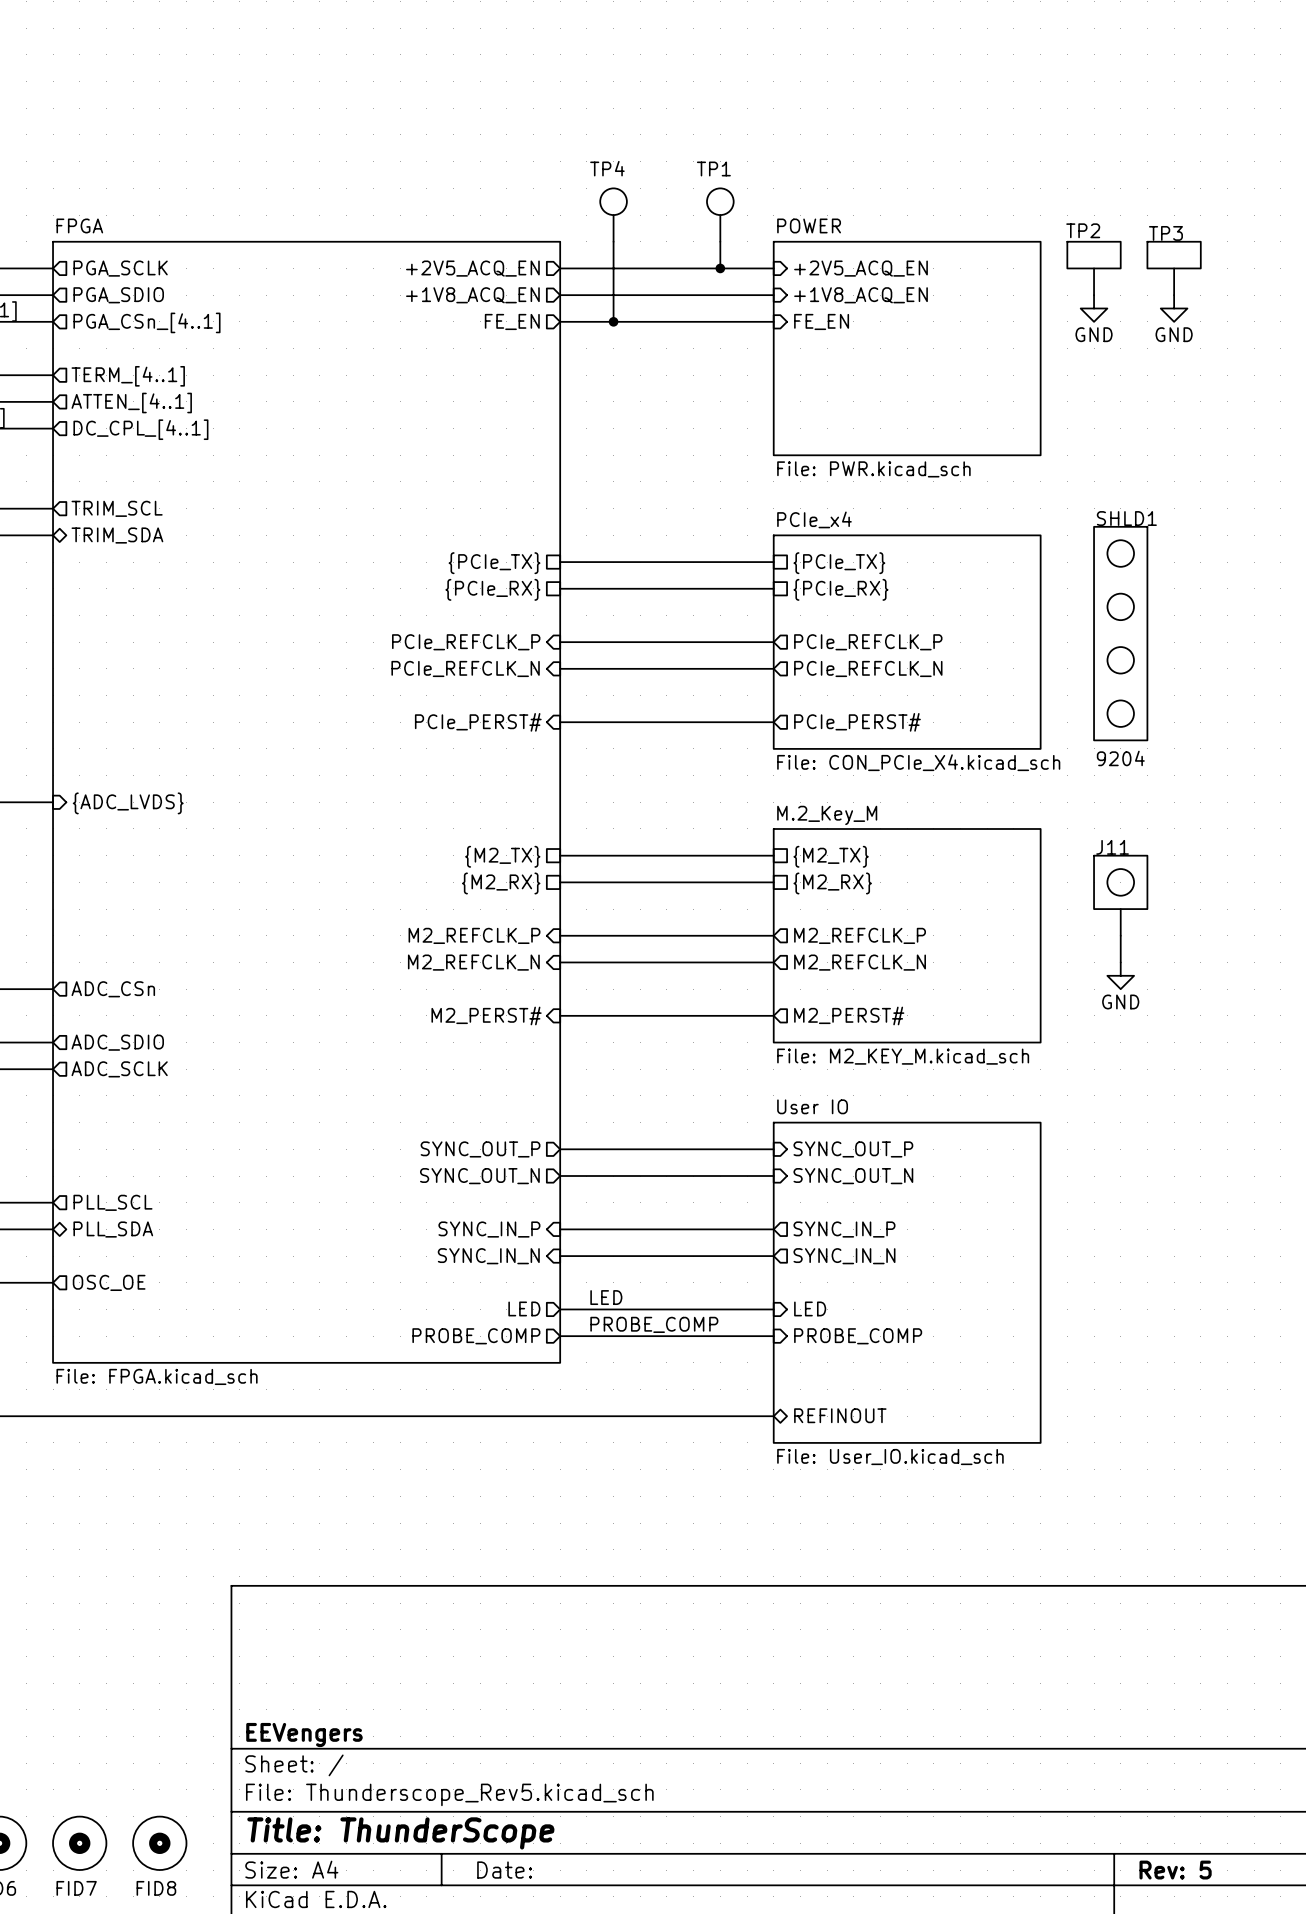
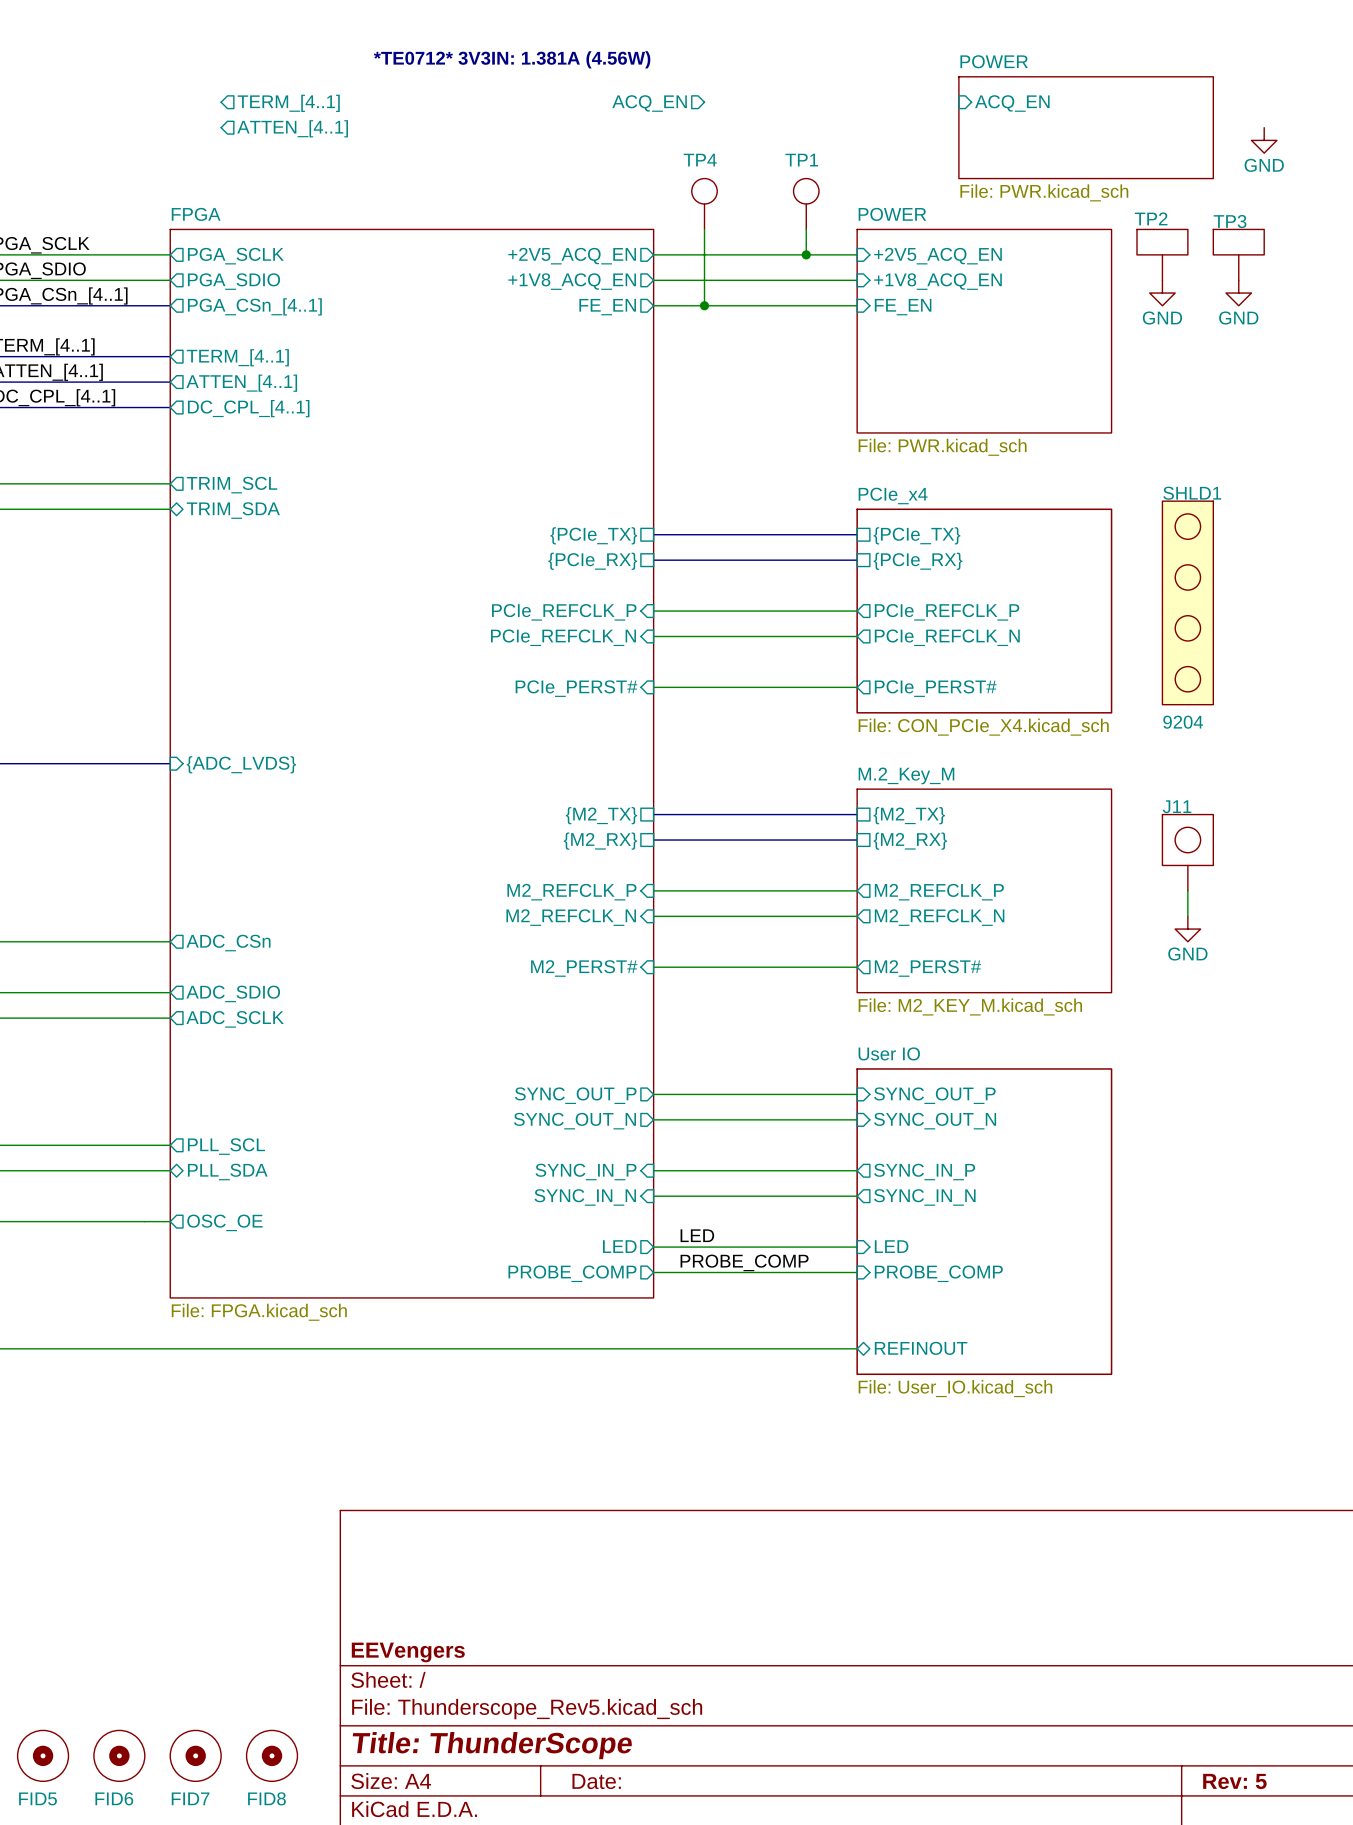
text: none -> *TE0712* 3V3IN: 1.381A (4.56W) (512, 59)
sheet pin: none -> ACQ_EN (649, 103)
sheet pin: none -> ACQ_EN (1012, 103)
sheet pin: none -> TERM_[4..1] (288, 103)
sheet POWER: none -> File: PWR.kicad_sch (1086, 127)
sheet pin: none -> ATTEN_[4..1] (292, 128)
power symbol: none -> GND (1264, 140)

